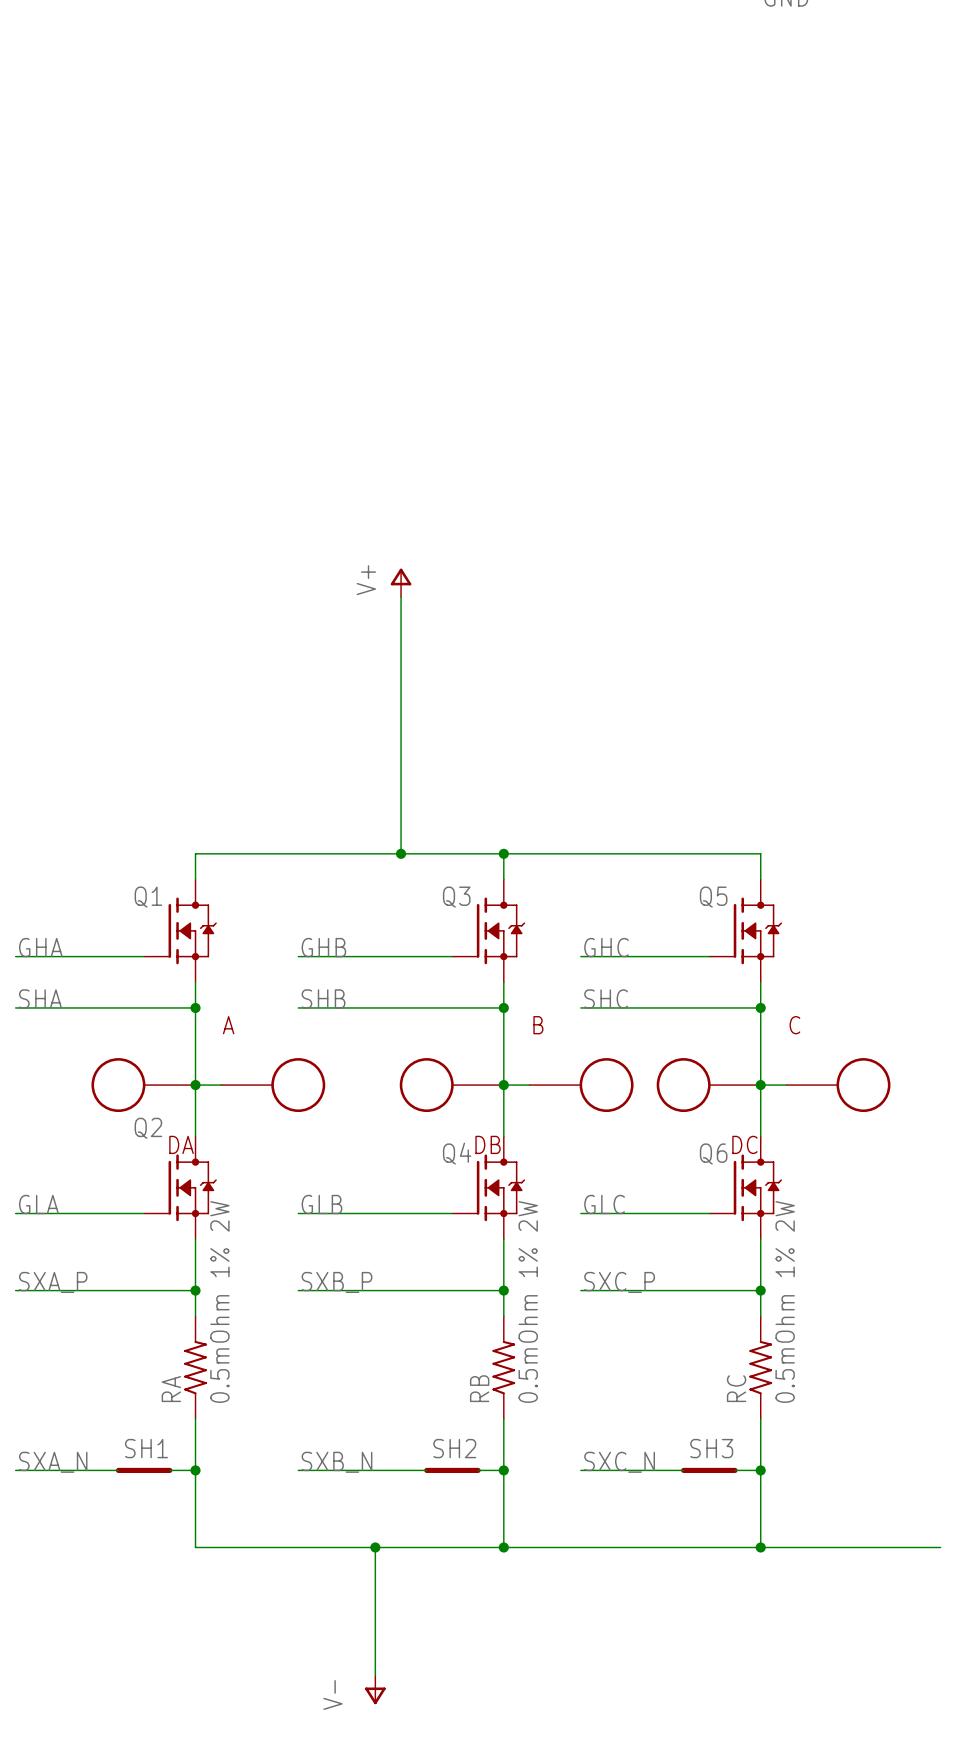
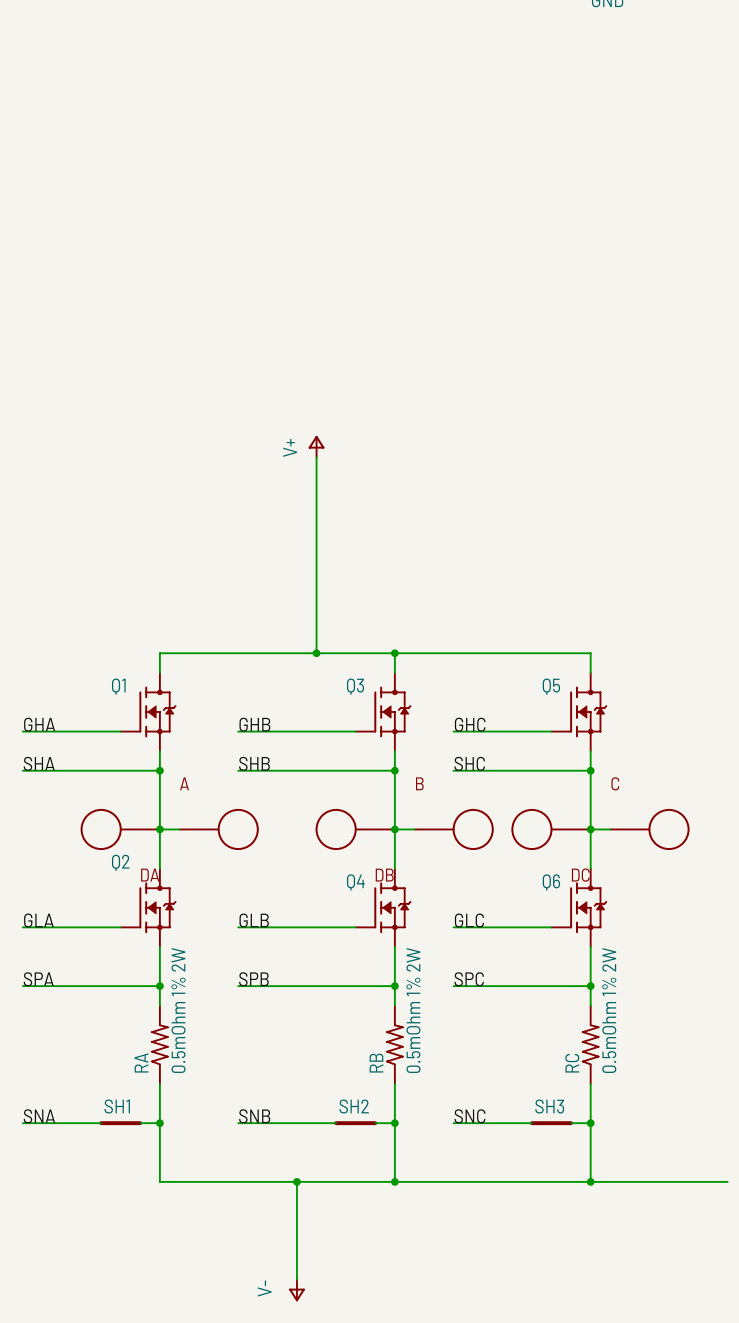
label: SXA_P (53, 1282) -> SPA (38, 979)
label: SXB_P (336, 1282) -> SPB (253, 979)
label: SXC_P (619, 1282) -> SPC (469, 979)
label: SXA_N (53, 1462) -> SNA (39, 1116)
label: SXB_N (336, 1462) -> SNB (254, 1116)
label: SXC_N (619, 1462) -> SNC (469, 1116)

